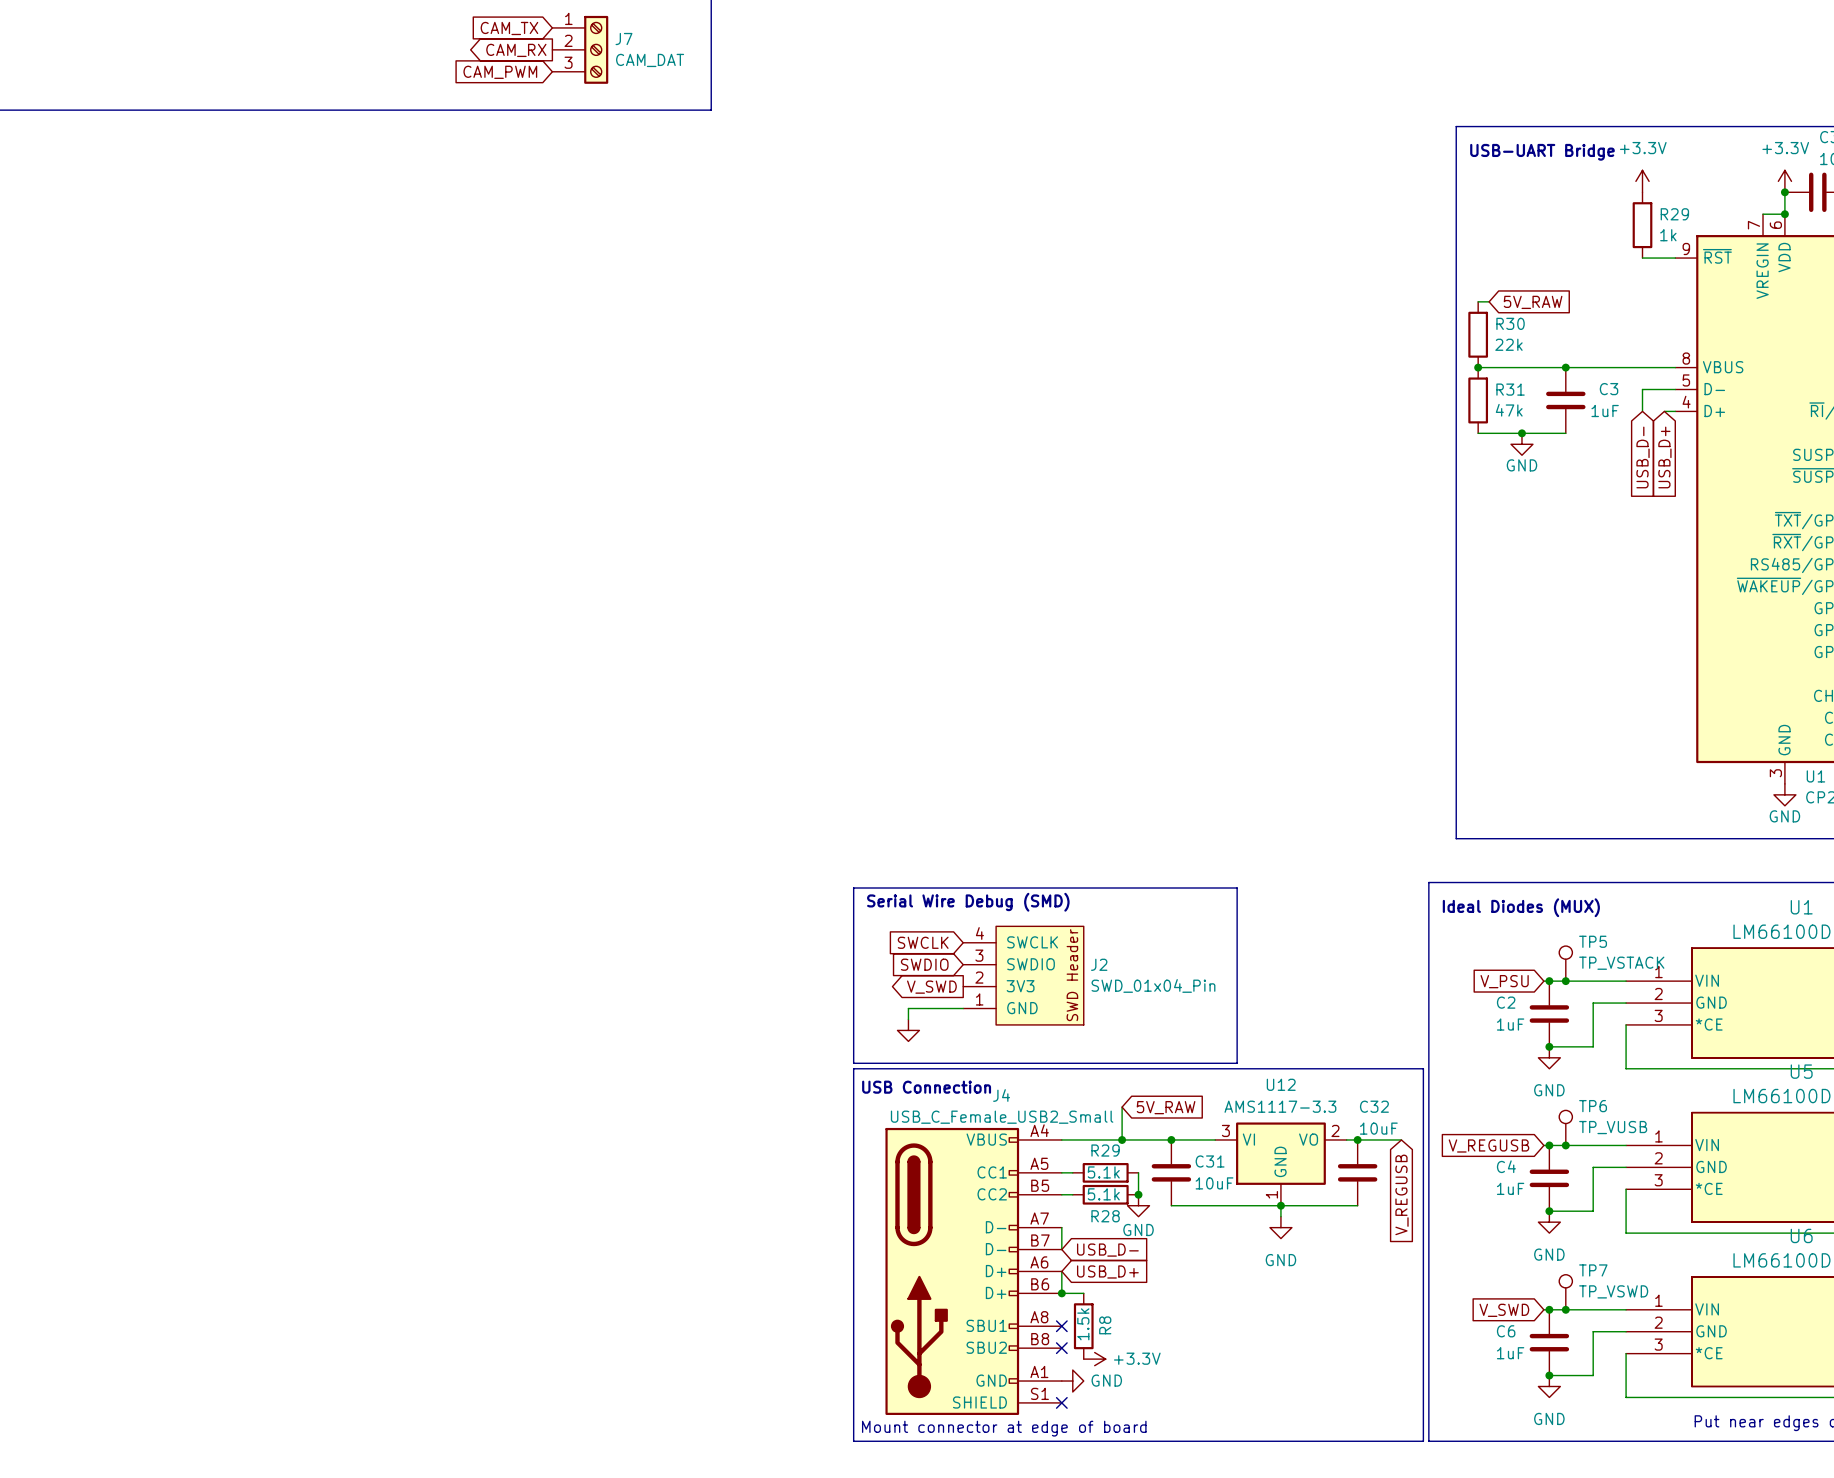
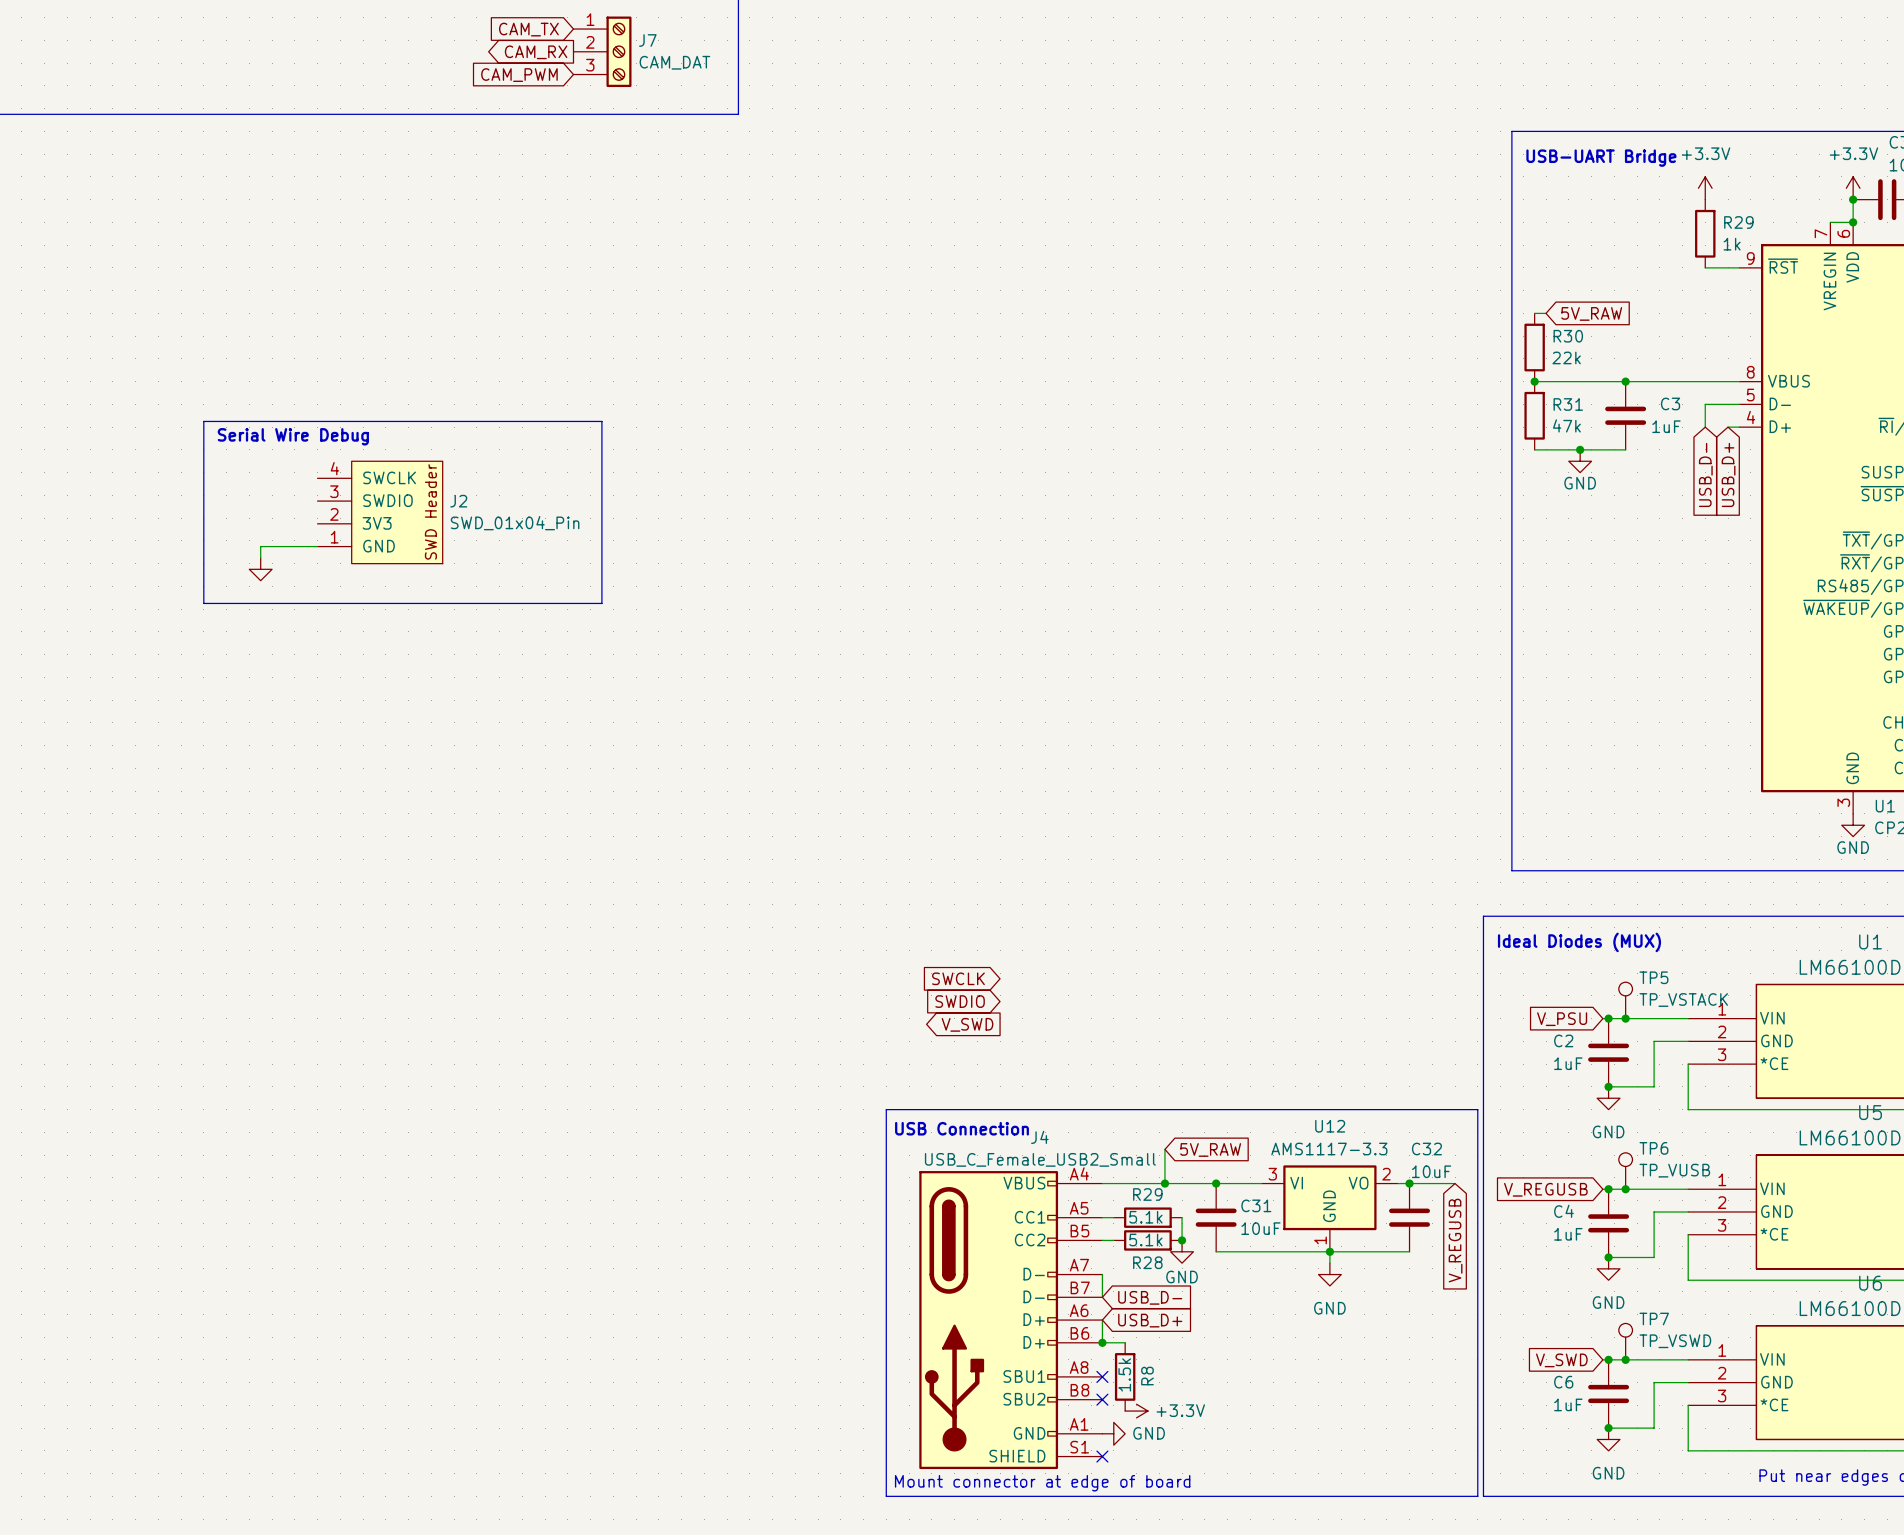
line: none -> (203, 421) (601, 421) (601, 603) (203, 603) (203, 421)
text: none -> Serial Wire Debug (293, 436)
wire: none -> (317, 546) (260, 546) (260, 557)
power symbol: none -> (260, 569)
line: (853, 888) (1237, 888) (1237, 1063) (853, 1063) (853, 888) -> none
text: Serial Wire Debug (SMD) (968, 902) -> none
J2 position: (1023, 975) -> (380, 512)
wire: (963, 1008) (908, 1008) (908, 1019) -> none
power symbol: (908, 1030) -> none

